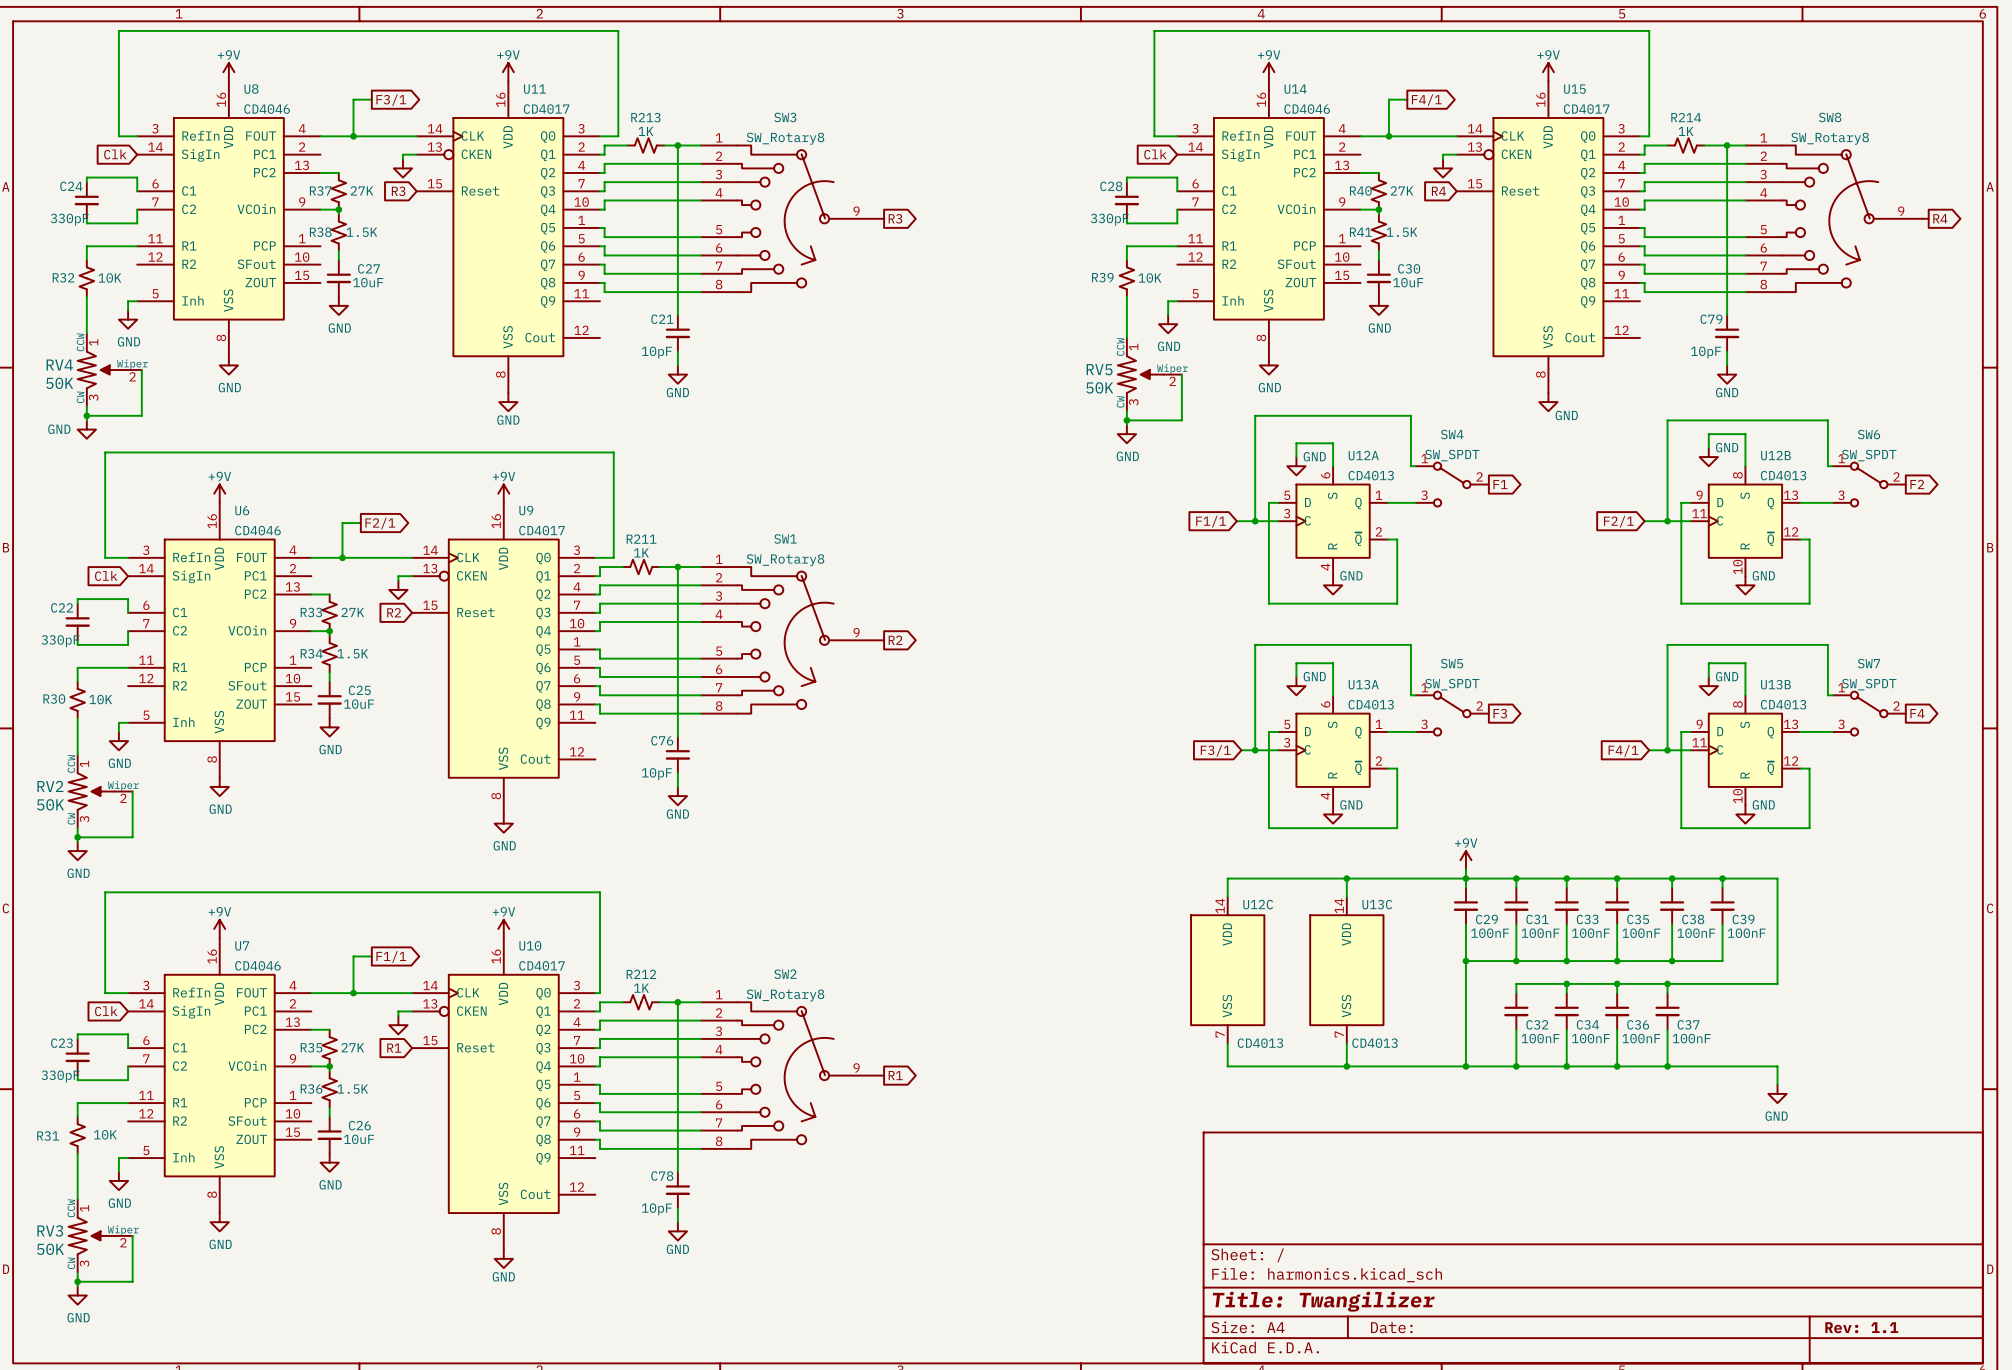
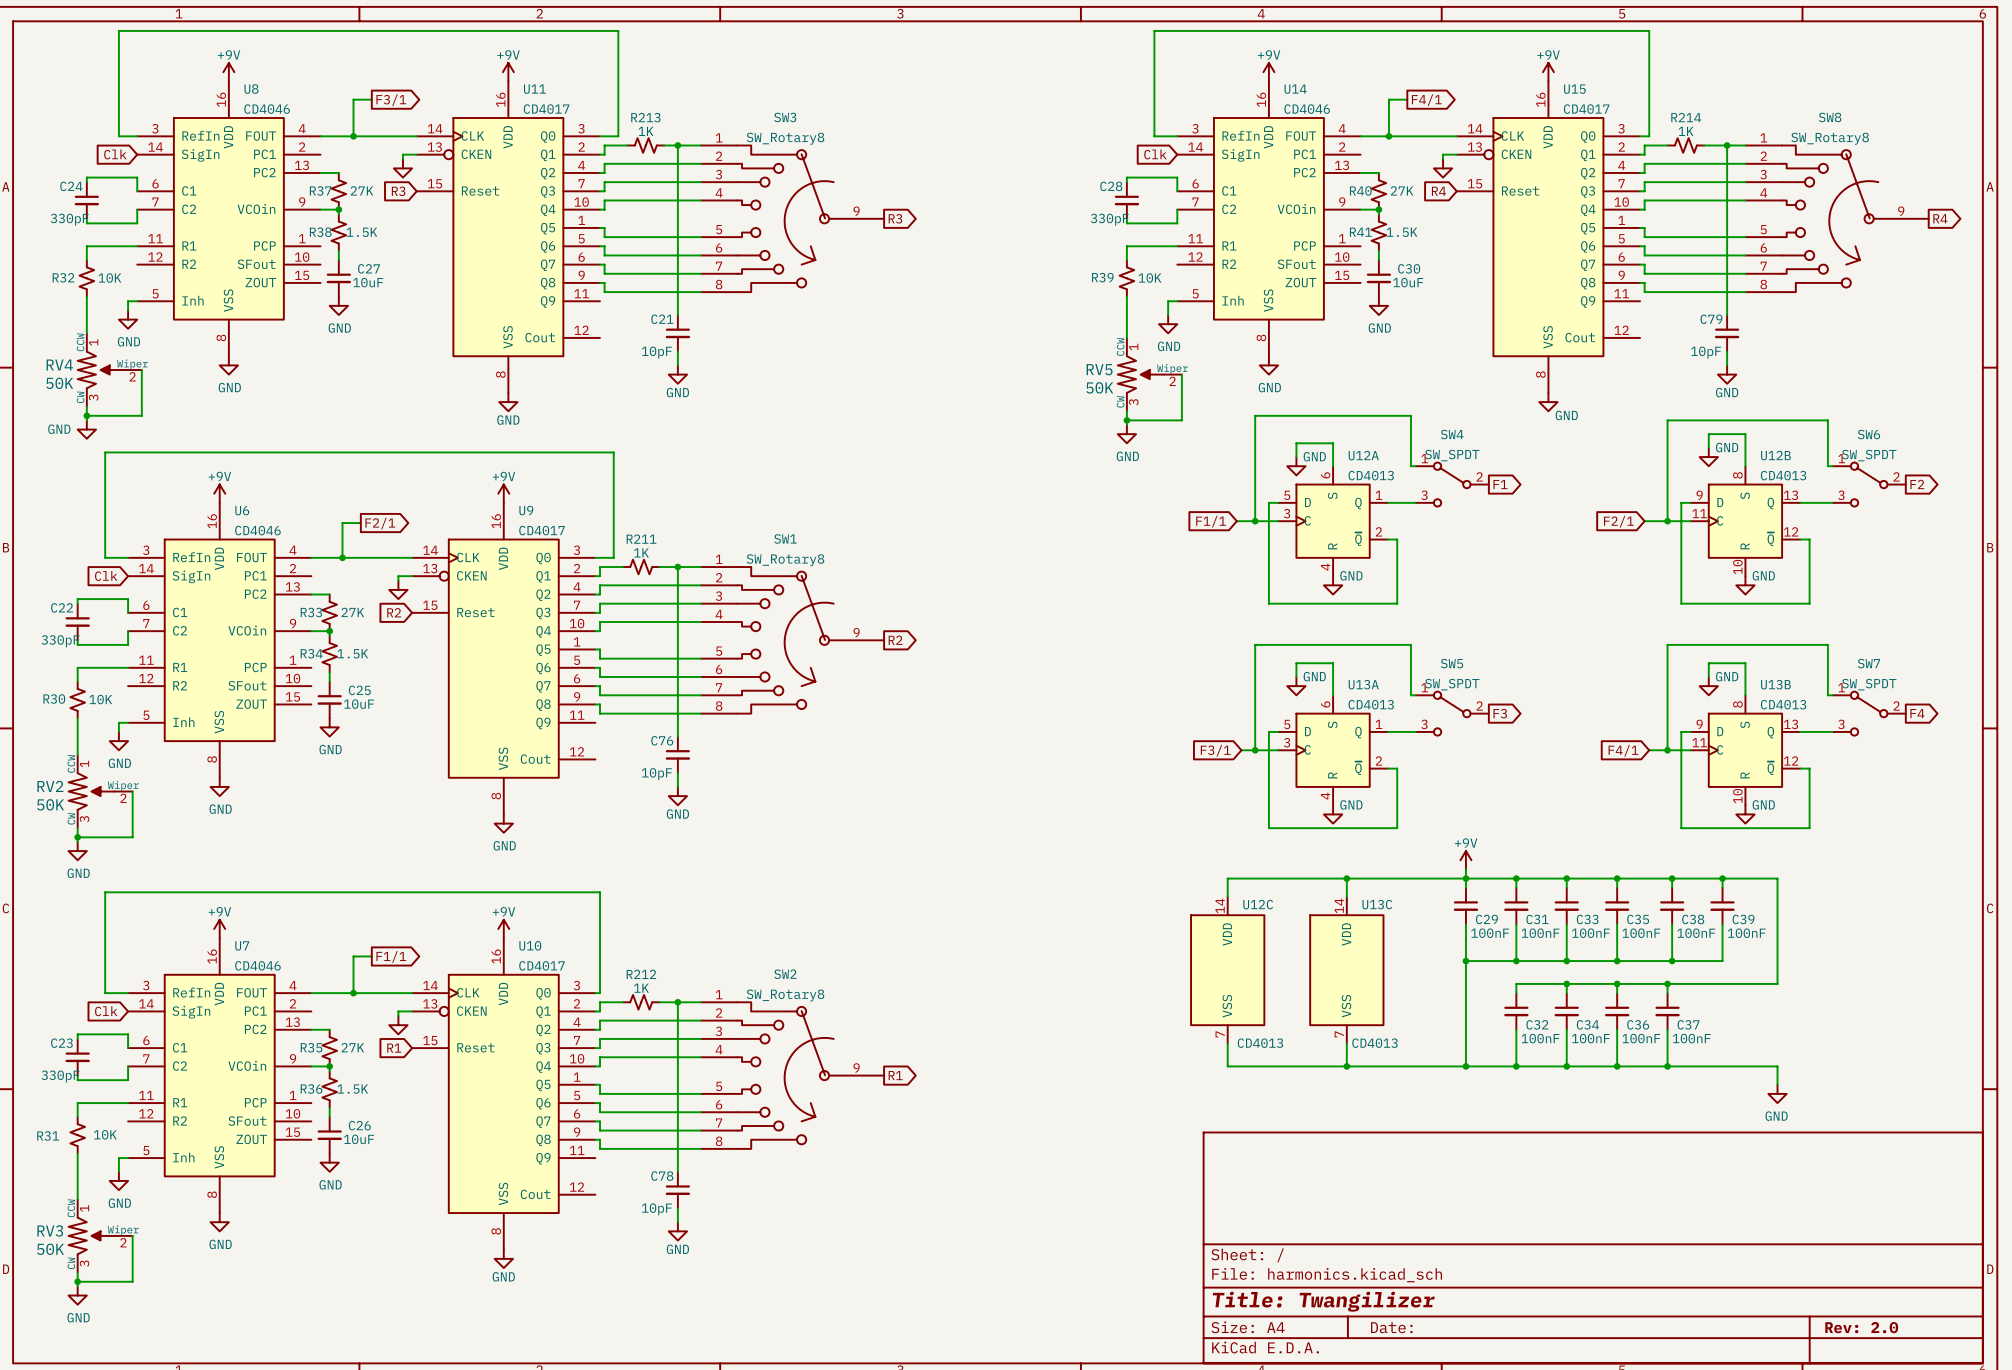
title block: Rev: 1.1 (1861, 1327) -> Rev: 2.0 (1861, 1327)

